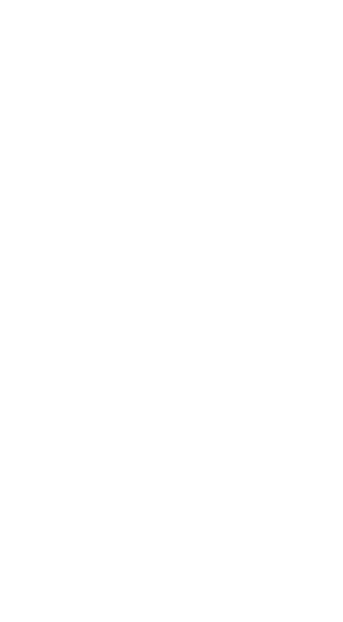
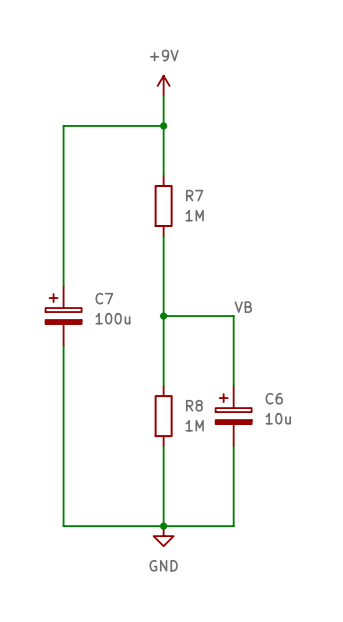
power symbol: none -> +9V (163, 85)
wire: none -> (163, 95) (163, 175)
wire: none -> (163, 125) (63, 125) (63, 286)
junction: none -> (163, 125)
R7: none -> 1M (163, 205)
wire: none -> (163, 236) (163, 386)
label: none -> VB (243, 307)
C7: none -> 100u (63, 316)
wire: none -> (163, 316) (233, 316) (233, 386)
junction: none -> (163, 316)
wire: none -> (63, 346) (63, 526) (233, 526) (233, 446)
R8: none -> 1M (163, 416)
C6: none -> 10u (233, 416)
wire: none -> (163, 446) (163, 526)
junction: none -> (163, 526)
power symbol: none -> GND (163, 536)

